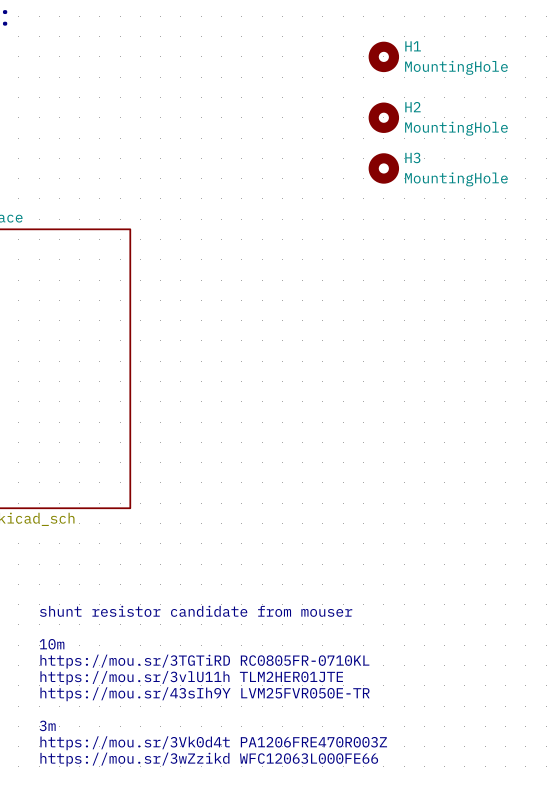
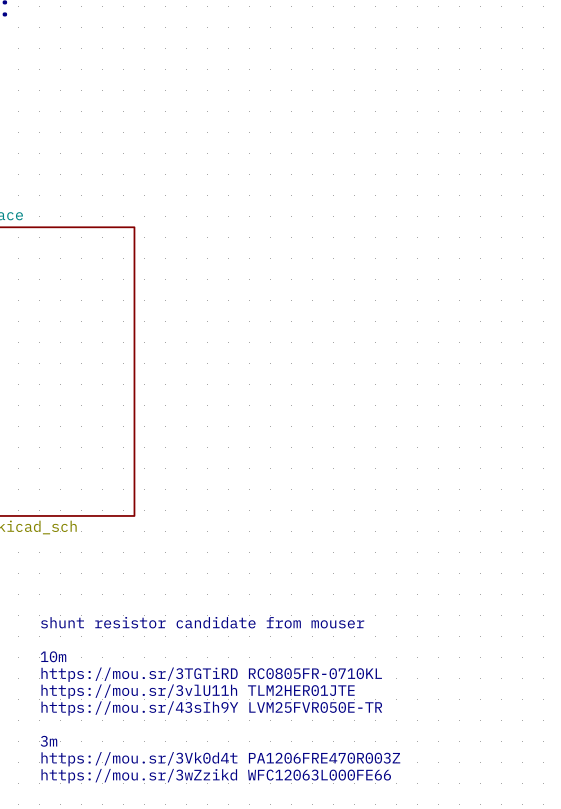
H1: MountingHole (383, 56) -> none
H2: MountingHole (383, 117) -> none
H3: MountingHole (383, 168) -> none

